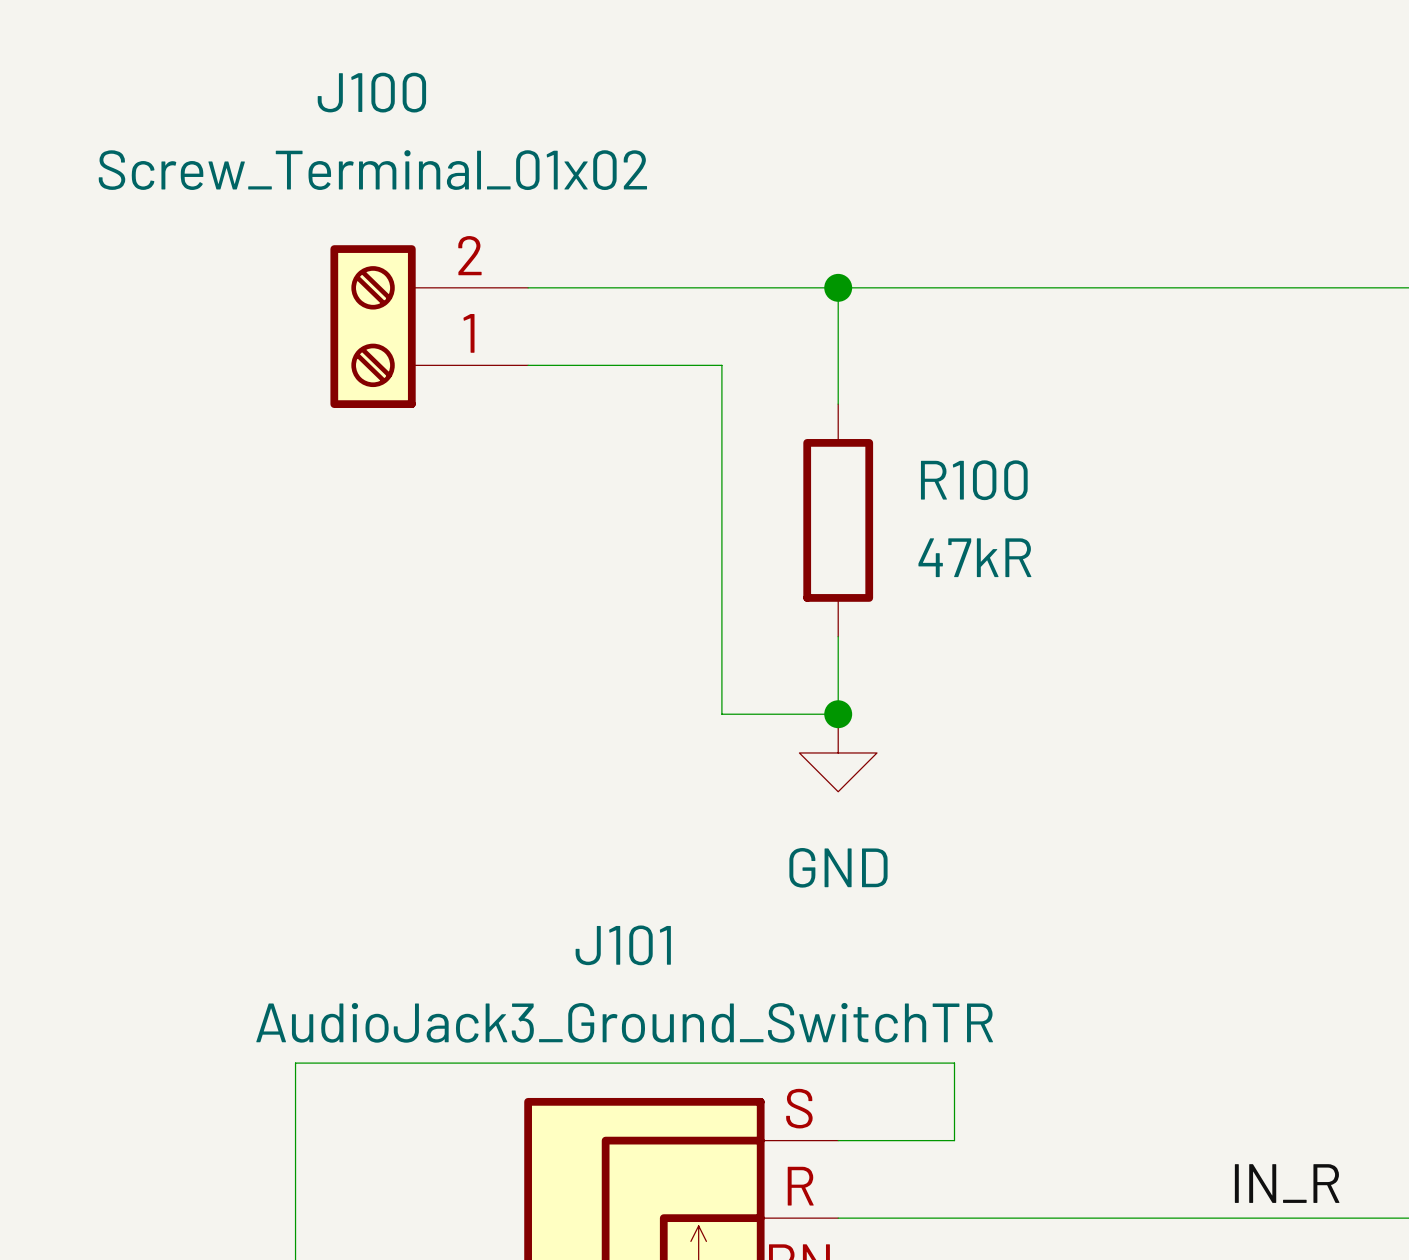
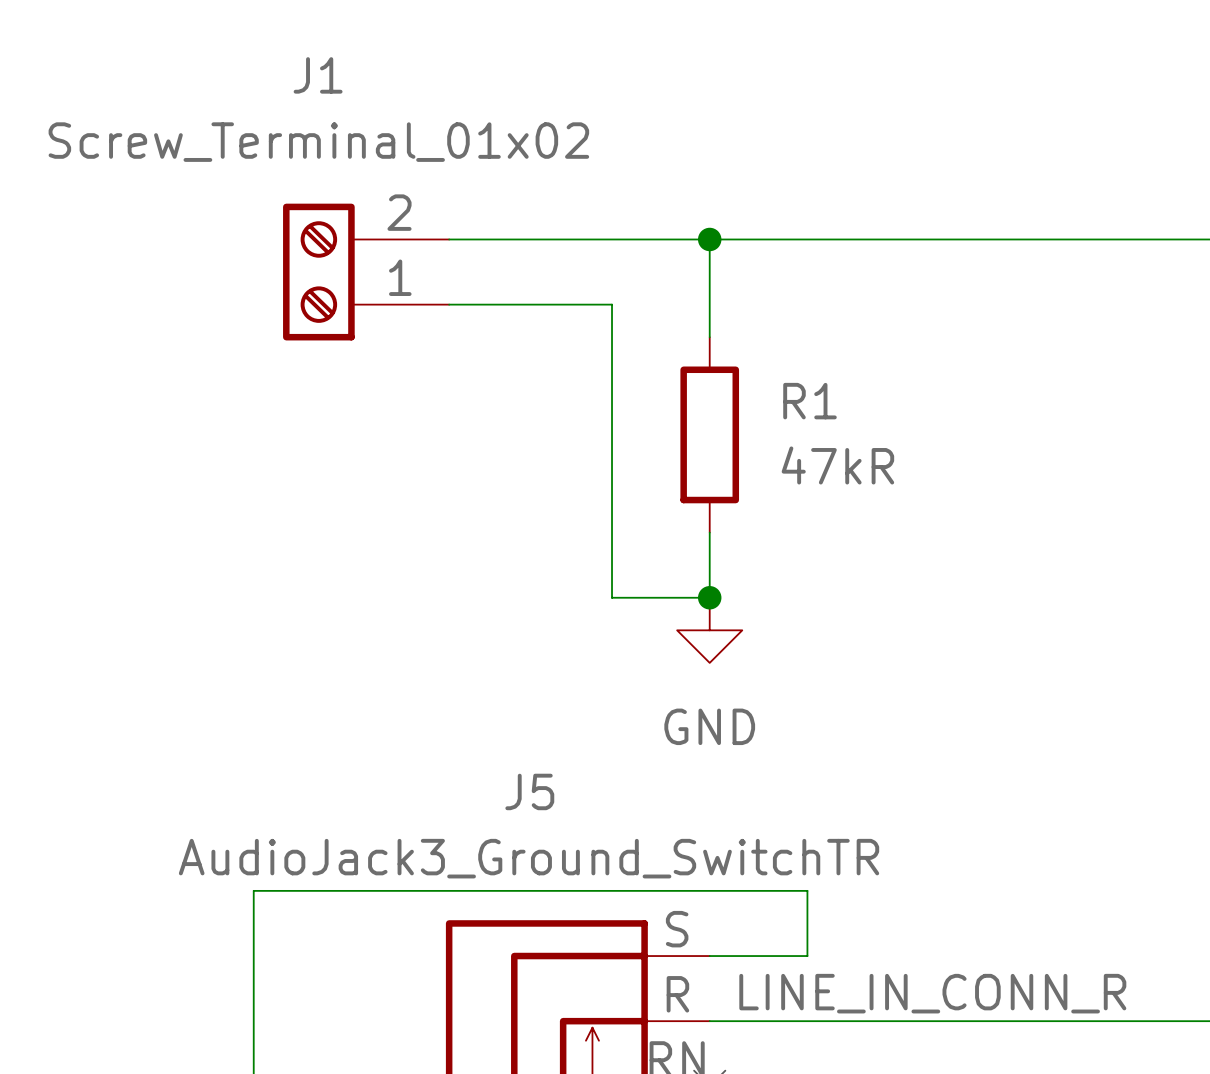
J100 name: J100 (371, 92) -> J1 (318, 75)
R100 name: R100 (974, 480) -> R1 (810, 401)
J101 name: J101 (623, 945) -> J5 (529, 791)
label: IN_R (1287, 1183) -> LINE_IN_CONN_R (932, 993)

